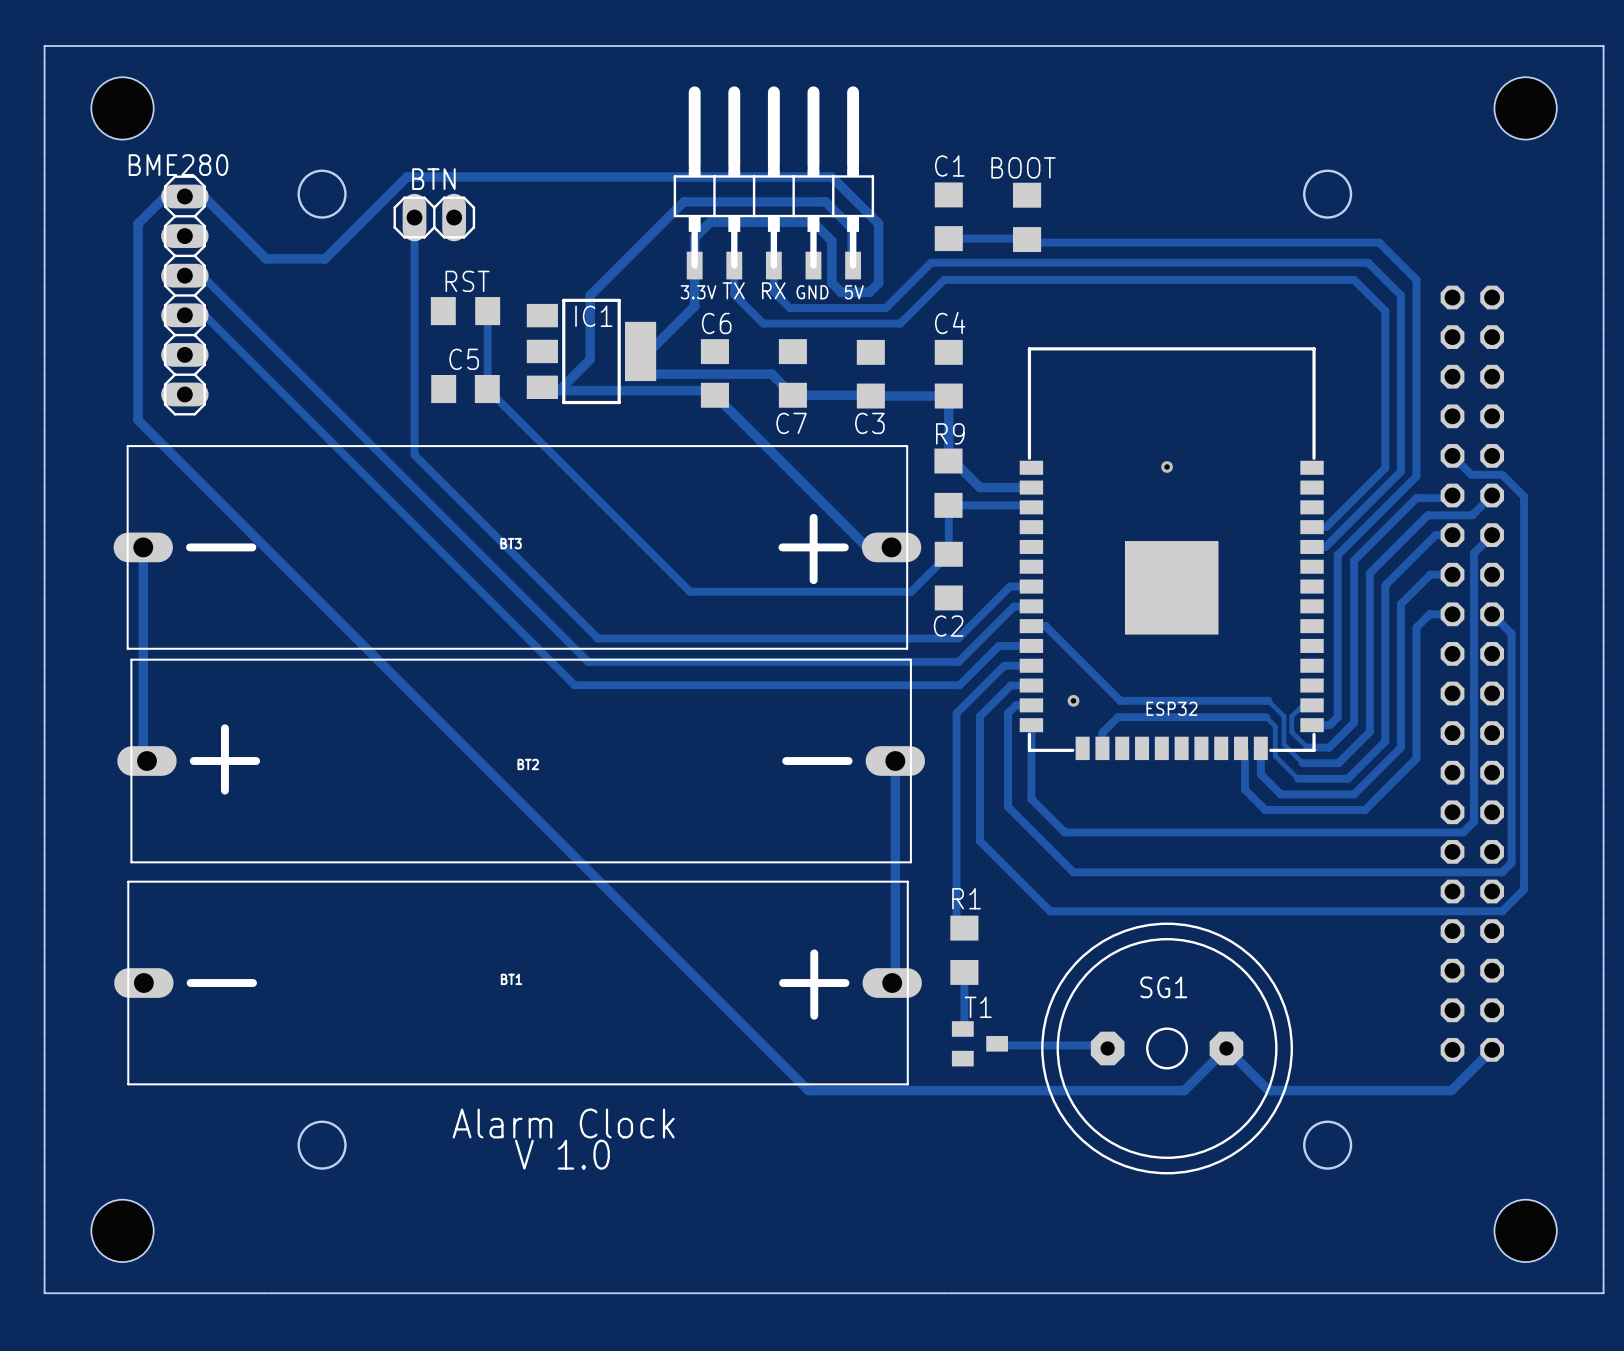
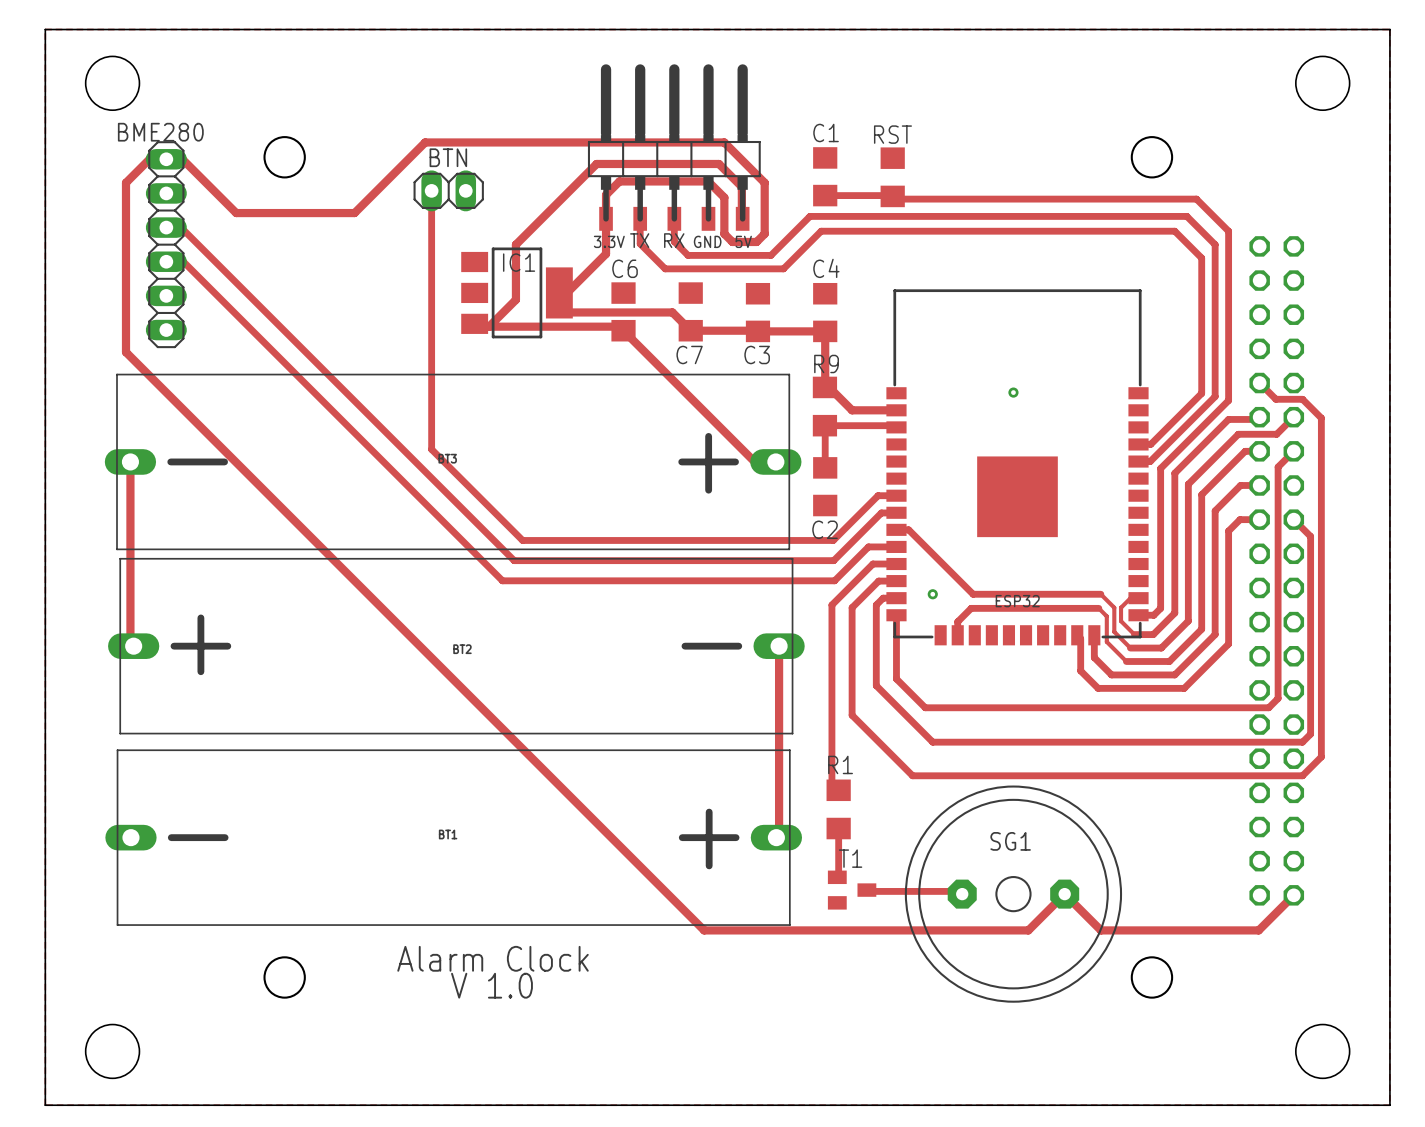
BOOT name: BOOT (1023, 167) -> RST (892, 134)
track: (484, 177) (407, 177) (325, 258) -> (425, 142) (354, 213) (287, 213)
track: (414, 217) (414, 454) (492, 532) -> (431, 190) (431, 449)
BTN position: (434, 217) -> (448, 190)
RST: (465, 311) -> none
track: (487, 311) (487, 389) (690, 591) (911, 591) (948, 554) -> none
C5: (465, 389) -> none

